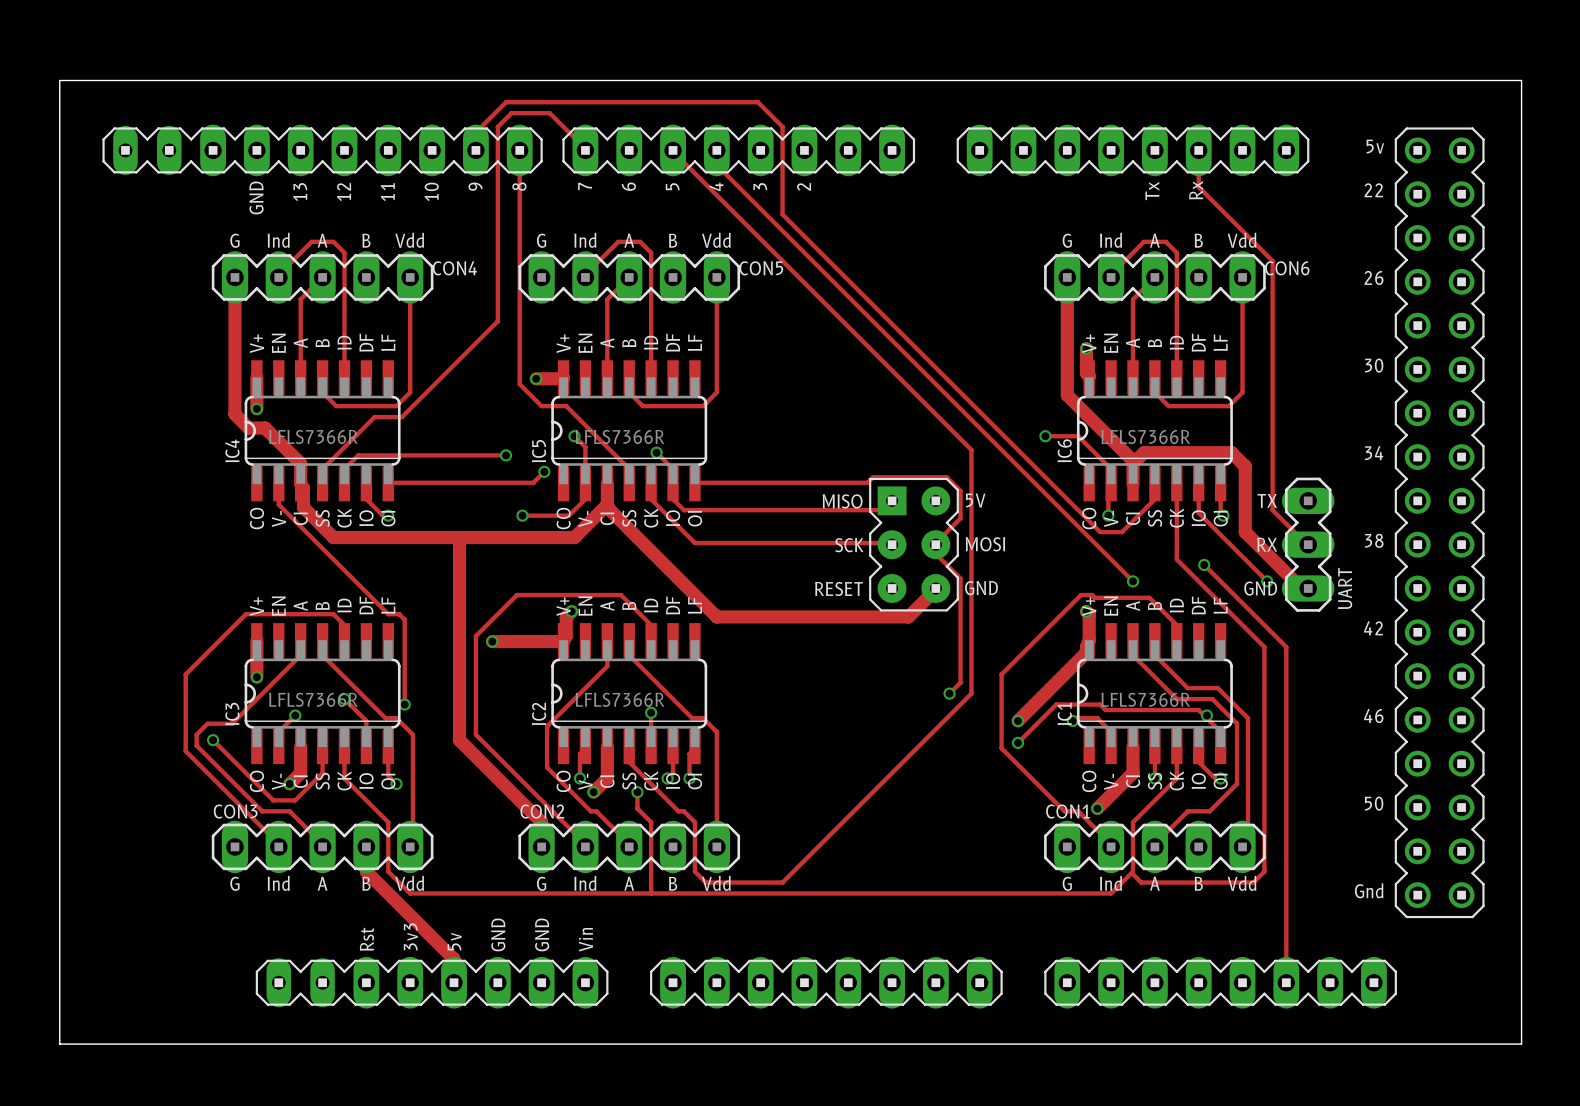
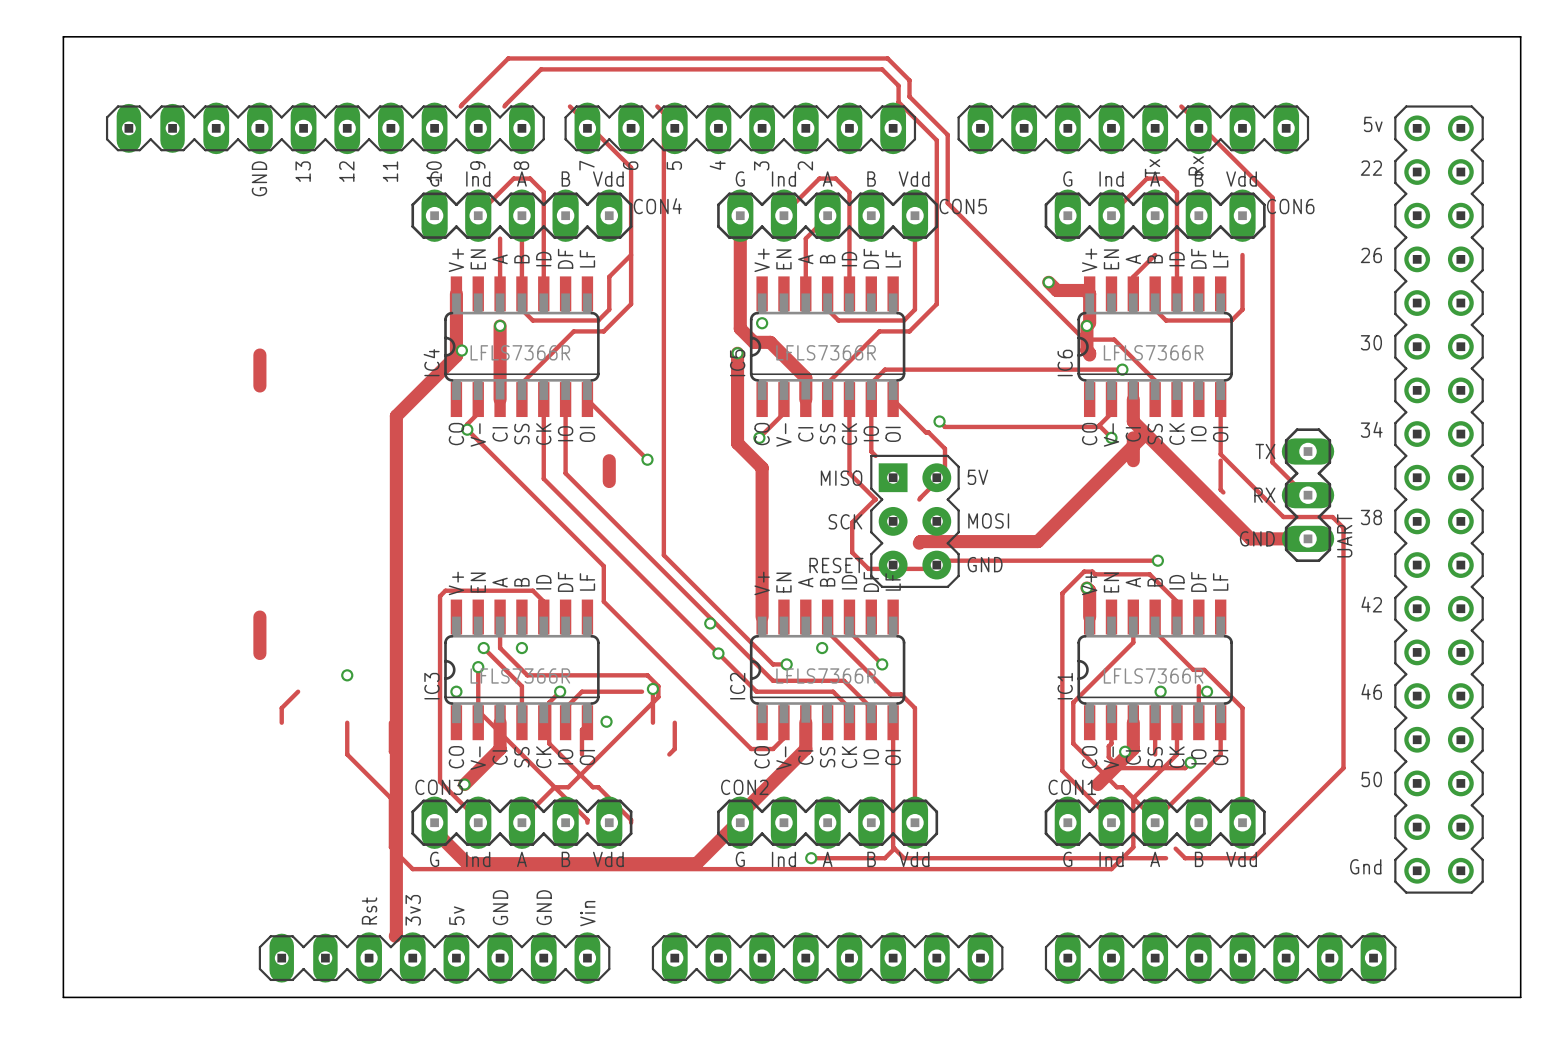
board edge: (59, 80) (1521, 80) -> (63, 58) (63, 36) (1520, 36) (1520, 58)
track: none -> (460, 106) (508, 58) (887, 58) (909, 80) (909, 96) (947, 134) (947, 203) (1084, 339) (1114, 339) (1155, 380) (1155, 399)
track: none -> (504, 106) (541, 69) (882, 69) (898, 85) (898, 102) (936, 140) (936, 304) (909, 331) (879, 331) (827, 383) (827, 399)
track: none -> (569, 106) (631, 167) (631, 304) (603, 331) (573, 331) (521, 383) (521, 399)
track: none -> (657, 106) (663, 113) (663, 555) (773, 664) (786, 664)
track: (475, 150) (475, 132) (506, 102) (757, 102) (782, 126) (782, 214) (1100, 532) (1122, 532) (1154, 499) (1154, 483) -> none
track: (519, 150) (519, 238) -> none
track: (585, 150) (549, 113) (511, 113) (497, 126) (497, 261) -> none
track: (673, 150) (971, 449) (971, 693) (782, 882) (705, 882) (694, 871) (694, 822) (684, 811) (678, 811) (629, 762) (629, 746) -> none
track: (716, 150) (716, 165) (1133, 581) -> none
track: (1198, 150) (1198, 187) (1272, 261) -> (1181, 106) (1272, 197) (1272, 238)
track: none -> (478, 215) (513, 178) (530, 178) (543, 192) (543, 293)
track: none -> (740, 215) (740, 328) (753, 342) (770, 342) (805, 377) (805, 399)
track: none -> (783, 215) (819, 178) (835, 178) (849, 192) (849, 293)
track: none -> (827, 215) (805, 238) (805, 293)
track: none -> (914, 215) (914, 309) (904, 320) (838, 320) (827, 309) (827, 293)
track: (1176, 252) (1165, 241) (1143, 241) (1111, 274) (1111, 277) -> (1176, 230) (1176, 192) (1163, 178) (1146, 178) (1111, 215)
track: (234, 277) (234, 414) (248, 428) (265, 428) (300, 463) (303, 507) (333, 537) (574, 537) (607, 504) (610, 510) (716, 616) (908, 616) (935, 588) -> none
track: (278, 277) (278, 274) (311, 241) (333, 241) (344, 252) (344, 377) -> none
track: (322, 277) (300, 299) (300, 377) -> none
CON4 position: (322, 277) -> (521, 215)
track: (410, 277) (410, 392) (396, 406) (336, 406) (322, 392) (322, 377) -> none
track: (585, 277) (585, 274) (618, 241) (640, 241) (651, 252) (651, 377) -> none
CON5 position: (629, 277) -> (827, 215)
track: (716, 277) (716, 392) (703, 406) (642, 406) (629, 392) (629, 377) -> none
track: (1067, 277) (1067, 395) (1133, 460) (1143, 452) (1231, 452) (1245, 466) (1245, 532) (1300, 586) (1308, 586) (1308, 588) -> none
CON6 position: (1154, 277) -> (1155, 215)
track: none -> (1048, 282) (1056, 290) (1084, 290) (1089, 293) (1089, 323)
via: none -> (1048, 282)
track: none -> (456, 293) (456, 355) (396, 416) (395, 936)
track: (497, 316) (497, 321) (401, 417) (374, 417) (322, 469) (322, 483) -> none
track: (1133, 316) (1133, 377) -> none
track: (1176, 316) (1176, 377) -> none
track: (519, 332) (519, 384) (541, 406) (566, 406) (629, 469) (629, 483) -> none
track: (607, 332) (607, 377) -> (609, 309) (598, 320) (532, 320) (521, 309)
track: (1242, 332) (1242, 392) (1228, 406) (1168, 406) (1154, 392) (1154, 377) -> (1242, 309) (1231, 320) (1166, 320) (1155, 309) (1155, 293)
via: none -> (762, 323)
track: none -> (500, 325) (500, 399)
via: none -> (500, 325)
via: none -> (461, 350)
track: none -> (737, 353) (737, 443) (762, 467) (762, 617)
via: none -> (737, 353)
track: (563, 377) (536, 378) -> none
via: (536, 378) -> none
track: none -> (1122, 369) (884, 369) (871, 383) (871, 451) (875, 455)
via: none -> (1122, 369)
via: (256, 408) -> none
track: none -> (478, 399) (478, 413) (467, 424) (467, 429) (603, 566) (603, 601) (751, 749) (773, 749) (783, 738) (783, 722)
track: none -> (543, 399) (543, 478) (756, 691) (833, 691) (849, 708) (849, 722)
track: none -> (565, 399) (565, 473) (773, 680) (844, 680) (871, 708) (871, 722)
track: none -> (587, 399) (647, 459)
track: none -> (783, 399) (783, 413) (759, 437)
track: none -> (849, 399) (849, 473) (875, 499) (852, 522) (852, 552) (868, 568) (928, 568) (936, 560) (1157, 560)
track: none -> (893, 399) (944, 448) (944, 473) (919, 499)
track: none -> (1111, 399) (1111, 413) (1097, 426) (944, 426) (939, 421)
track: none -> (1133, 399) (1133, 421) (1250, 538) (1308, 538)
IC4 position: (322, 430) -> (521, 346)
IC5 position: (629, 430) -> (827, 346)
IC6 position: (1154, 430) -> (1155, 346)
track: (574, 436) (585, 447) (585, 499) (569, 515) (522, 515) -> none
via: (574, 436) -> none
track: (1045, 436) (1078, 436) (1111, 469) (1111, 485) (1108, 488) (1108, 515) -> none
via: (1045, 436) -> none
via: none -> (939, 421)
track: none -> (1099, 425) (1111, 437)
via: none -> (467, 429)
track: (656, 452) (673, 469) (673, 499) (684, 510) (883, 510) (892, 500) -> none
via position: (656, 452) -> (647, 459)
track: (506, 455) (358, 455) (344, 469) (344, 483) -> none
via: (506, 455) -> none
track: none -> (1145, 433) (1037, 541) (920, 541) (919, 543)
via: none -> (759, 437)
via: none -> (1111, 437)
track: (544, 471) (533, 482) (388, 483) -> none
via: (544, 471) -> none
track: (278, 483) (278, 504) (388, 614) (399, 614) (404, 619) (404, 704) -> none
track: (366, 483) (366, 499) (382, 515) (388, 515) -> none
track: (651, 483) (651, 499) (694, 543) (892, 543) (892, 544) -> none
track: (694, 483) (867, 482) (872, 477) (946, 477) (960, 491) (960, 518) (935, 543) (935, 553) (960, 578) (960, 682) (949, 693) -> none
track: (1176, 483) (1176, 559) (1264, 647) (1264, 871) -> (1220, 399) (1220, 454) (1283, 517) (1332, 517) (1343, 527) (1343, 768) (1264, 847)
track: (1198, 483) (1198, 512) (1267, 581) -> none
track: (1272, 485) (1272, 510) (1308, 544) -> (1272, 462) (1305, 495) (1308, 495)
via: (388, 515) -> none
via: (522, 515) -> none
via: (1108, 515) -> none
via: (1223, 515) -> none
track: (459, 537) (459, 740) (541, 822) (541, 846) -> none
UART position: (1308, 544) -> (1308, 495)
track: (1204, 564) (1286, 647) (1286, 982) -> none
via: (1204, 564) -> none
via position: (1133, 581) -> (1157, 560)
via: (1267, 581) -> none
track: (1083, 595) (1080, 595) (1001, 674) (1001, 748) (1064, 811) (1078, 811) -> (1084, 571) (1062, 593) (1062, 770) (1078, 787)
track: (571, 611) (566, 616) (566, 636) (563, 641) (492, 641) -> none
via: (571, 611) -> none
track: (300, 640) (300, 655) (232, 723) (207, 723) (196, 734) (196, 745) (262, 811) (289, 811) (322, 844) (322, 846) -> none
track: (322, 640) (322, 655) (385, 718) (396, 718) (412, 734) (412, 844) (410, 846) -> none
track: (344, 640) (344, 625) (333, 614) (245, 614) (185, 674) (185, 751) (278, 844) (278, 846) -> none
track: none -> (500, 617) (500, 648) (527, 675) (647, 675) (658, 686) (658, 697) (568, 787) (554, 787) (521, 819) (521, 822)
track: none -> (543, 617) (543, 601) (532, 590) (445, 590) (440, 596) (440, 781) (478, 819) (478, 822)
track: (607, 640) (607, 666) (558, 715) -> none
track: (629, 640) (629, 655) (692, 718) (703, 718) (716, 731) (716, 846) -> (827, 617) (827, 631) (890, 694) (901, 694) (914, 708) (914, 822)
track: (651, 640) (651, 625) (621, 595) (516, 595) (475, 636) (475, 690) -> none
track: none -> (849, 617) (849, 631) (882, 664)
track: (1089, 640) (1086, 652) (1018, 720) -> none
via: (492, 641) -> none
via: none -> (710, 623)
track: (1133, 655) (1176, 699) (1212, 699) (1237, 723) (1237, 783) (1209, 811) (1187, 811) -> (1133, 631) (1133, 642) (1073, 702) (1073, 743) (1116, 787) (1122, 787) (1155, 819)
track: none -> (483, 648) (521, 686) (521, 722)
via: none -> (483, 648)
via: none -> (521, 648)
via: none -> (822, 648)
via: (256, 677) -> none
via: none -> (718, 653)
via: none -> (786, 664)
via: none -> (882, 664)
track: (1187, 688) (1217, 688) (1248, 718) (1248, 841) (1242, 846) -> (1187, 664) (1193, 669) (1204, 669) (1242, 708) (1242, 822)
via: none -> (478, 667)
IC3 position: (322, 693) -> (521, 669)
IC2 position: (629, 693) -> (827, 669)
via: (949, 693) -> none
track: (344, 699) (366, 720) (366, 746) -> none
via: (404, 704) -> none
via: (295, 715) -> none
via: none -> (456, 691)
via: none -> (560, 691)
track: none -> (642, 691) (581, 691) (565, 708) (565, 722)
via: none -> (1160, 691)
via: (1018, 720) -> none
track: (1072, 720) (1075, 718) (1097, 718) (1111, 731) (1111, 746) -> (1190, 762) (1185, 768) (1119, 768) (1108, 757) (1108, 746) (1111, 743) (1111, 722)
via: (1072, 720) -> none
track: (213, 740) (273, 800) (295, 800) (322, 773) (322, 746) -> none
via: (213, 740) -> none
track: (1018, 742) (1056, 704) (1100, 704) (1105, 710) (1198, 710) (1220, 731) (1220, 746) -> (1187, 787) (1220, 754) (1220, 722)
via: (1018, 742) -> none
via: none -> (606, 721)
track: (300, 746) (300, 773) (289, 783) -> none
track: none -> (500, 722) (500, 749) (464, 784)
track: (607, 746) (607, 778) (593, 792) -> none
track: (694, 746) (689, 753) (689, 778) -> none
track: none -> (805, 722) (805, 749) (740, 814) (740, 822) (734, 825) (696, 863) (467, 863) (434, 830) (434, 822)
track: (1198, 746) (1198, 762) (1215, 778) (1220, 778) -> (1198, 722) (1198, 686)
via: none -> (1125, 751)
via: (579, 778) -> none
via: (667, 778) -> none
via: (689, 778) -> none
via: (1154, 778) -> none
via: (1220, 778) -> none
via: (289, 783) -> none
via: (396, 783) -> none
via: none -> (1190, 762)
via: (593, 792) -> none
track: (637, 792) (637, 808) (651, 822) (651, 893) -> none
via: (637, 792) -> none
via: none -> (464, 784)
via: (1097, 808) -> none
CON3 position: (322, 846) -> (521, 822)
track: (366, 846) (366, 871) (454, 959) (454, 982) -> none
CON2 position: (629, 846) -> (827, 822)
track: none -> (894, 848) (884, 858) (811, 858)
track: (1131, 872) (1141, 882) -> (893, 722) (893, 847) (904, 858) (1141, 858)
via: none -> (811, 858)
track: (1165, 882) (1185, 882) -> (1175, 848) (1185, 858)
board edge: (59, 1022) (59, 1044) (1521, 1044) (1521, 1022) -> (63, 997) (1520, 997)

